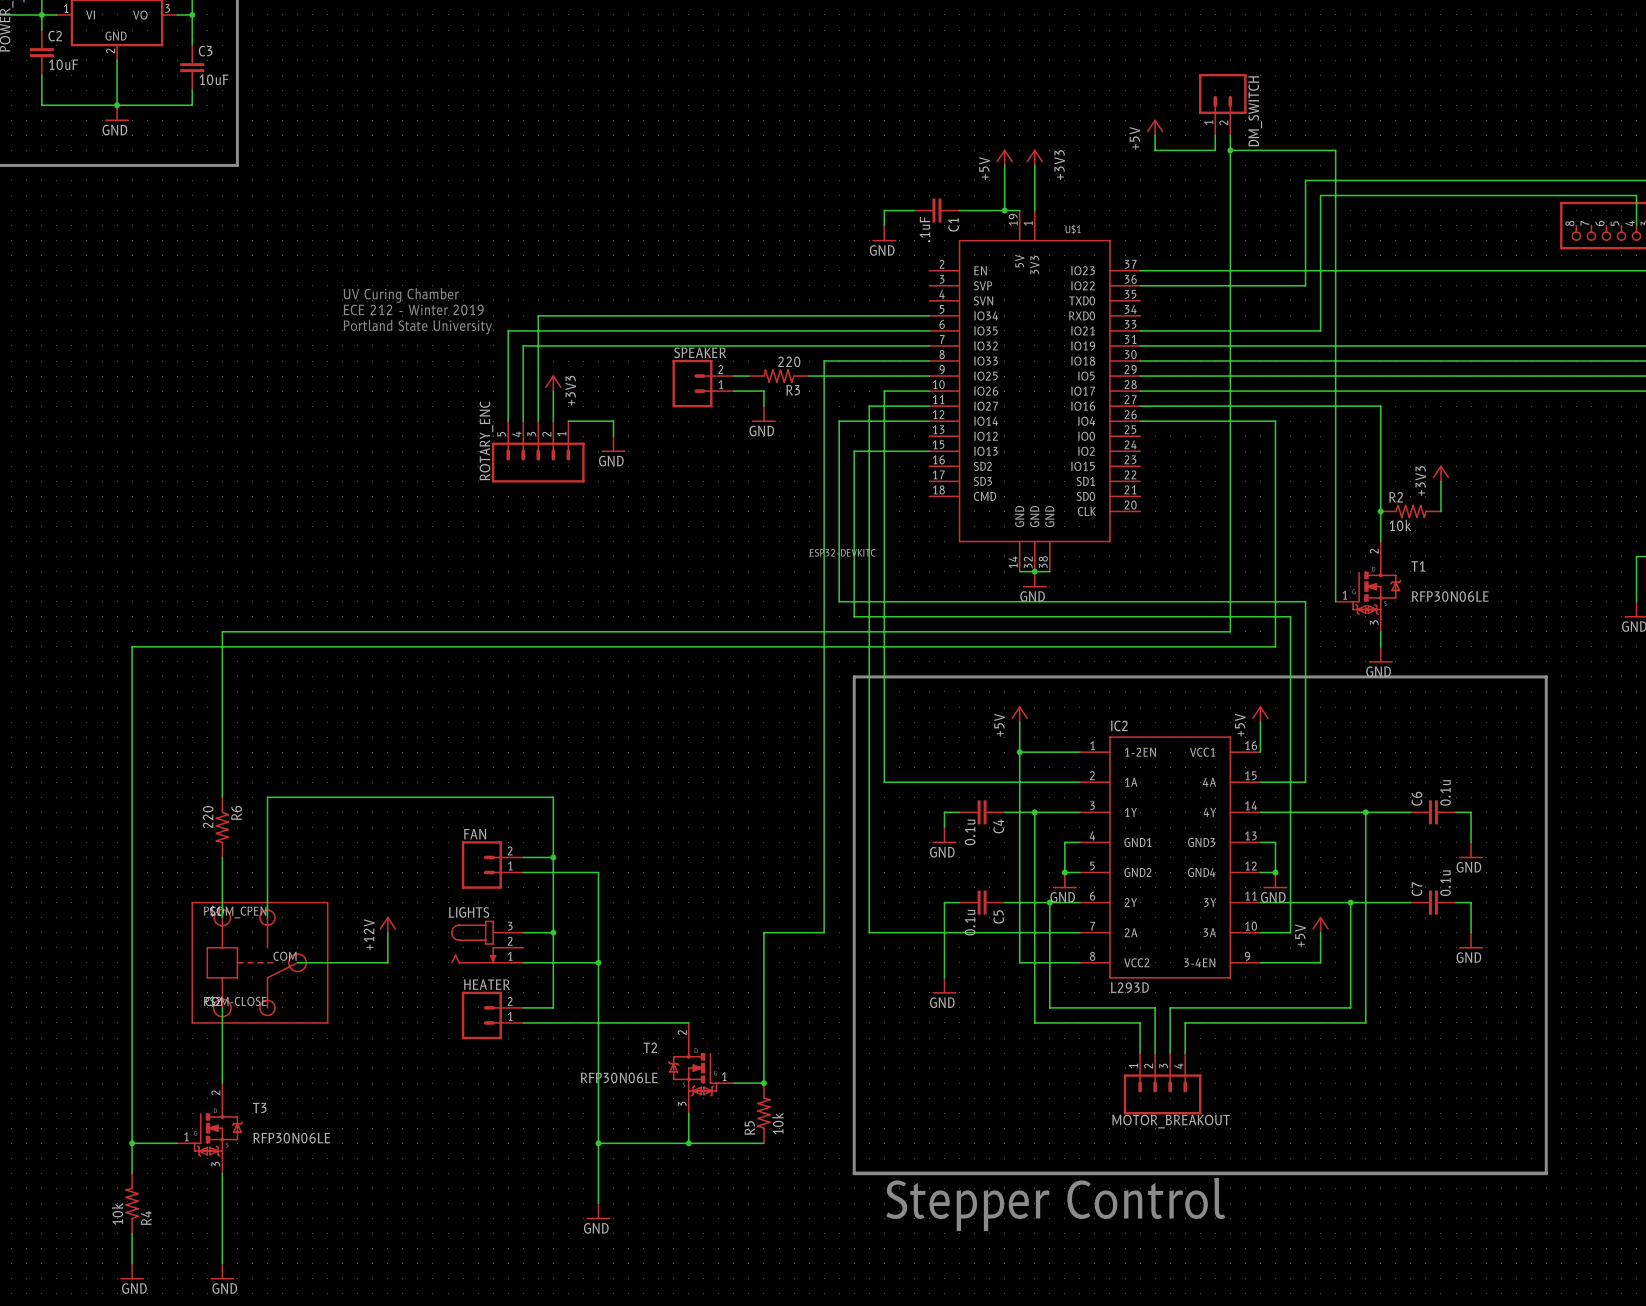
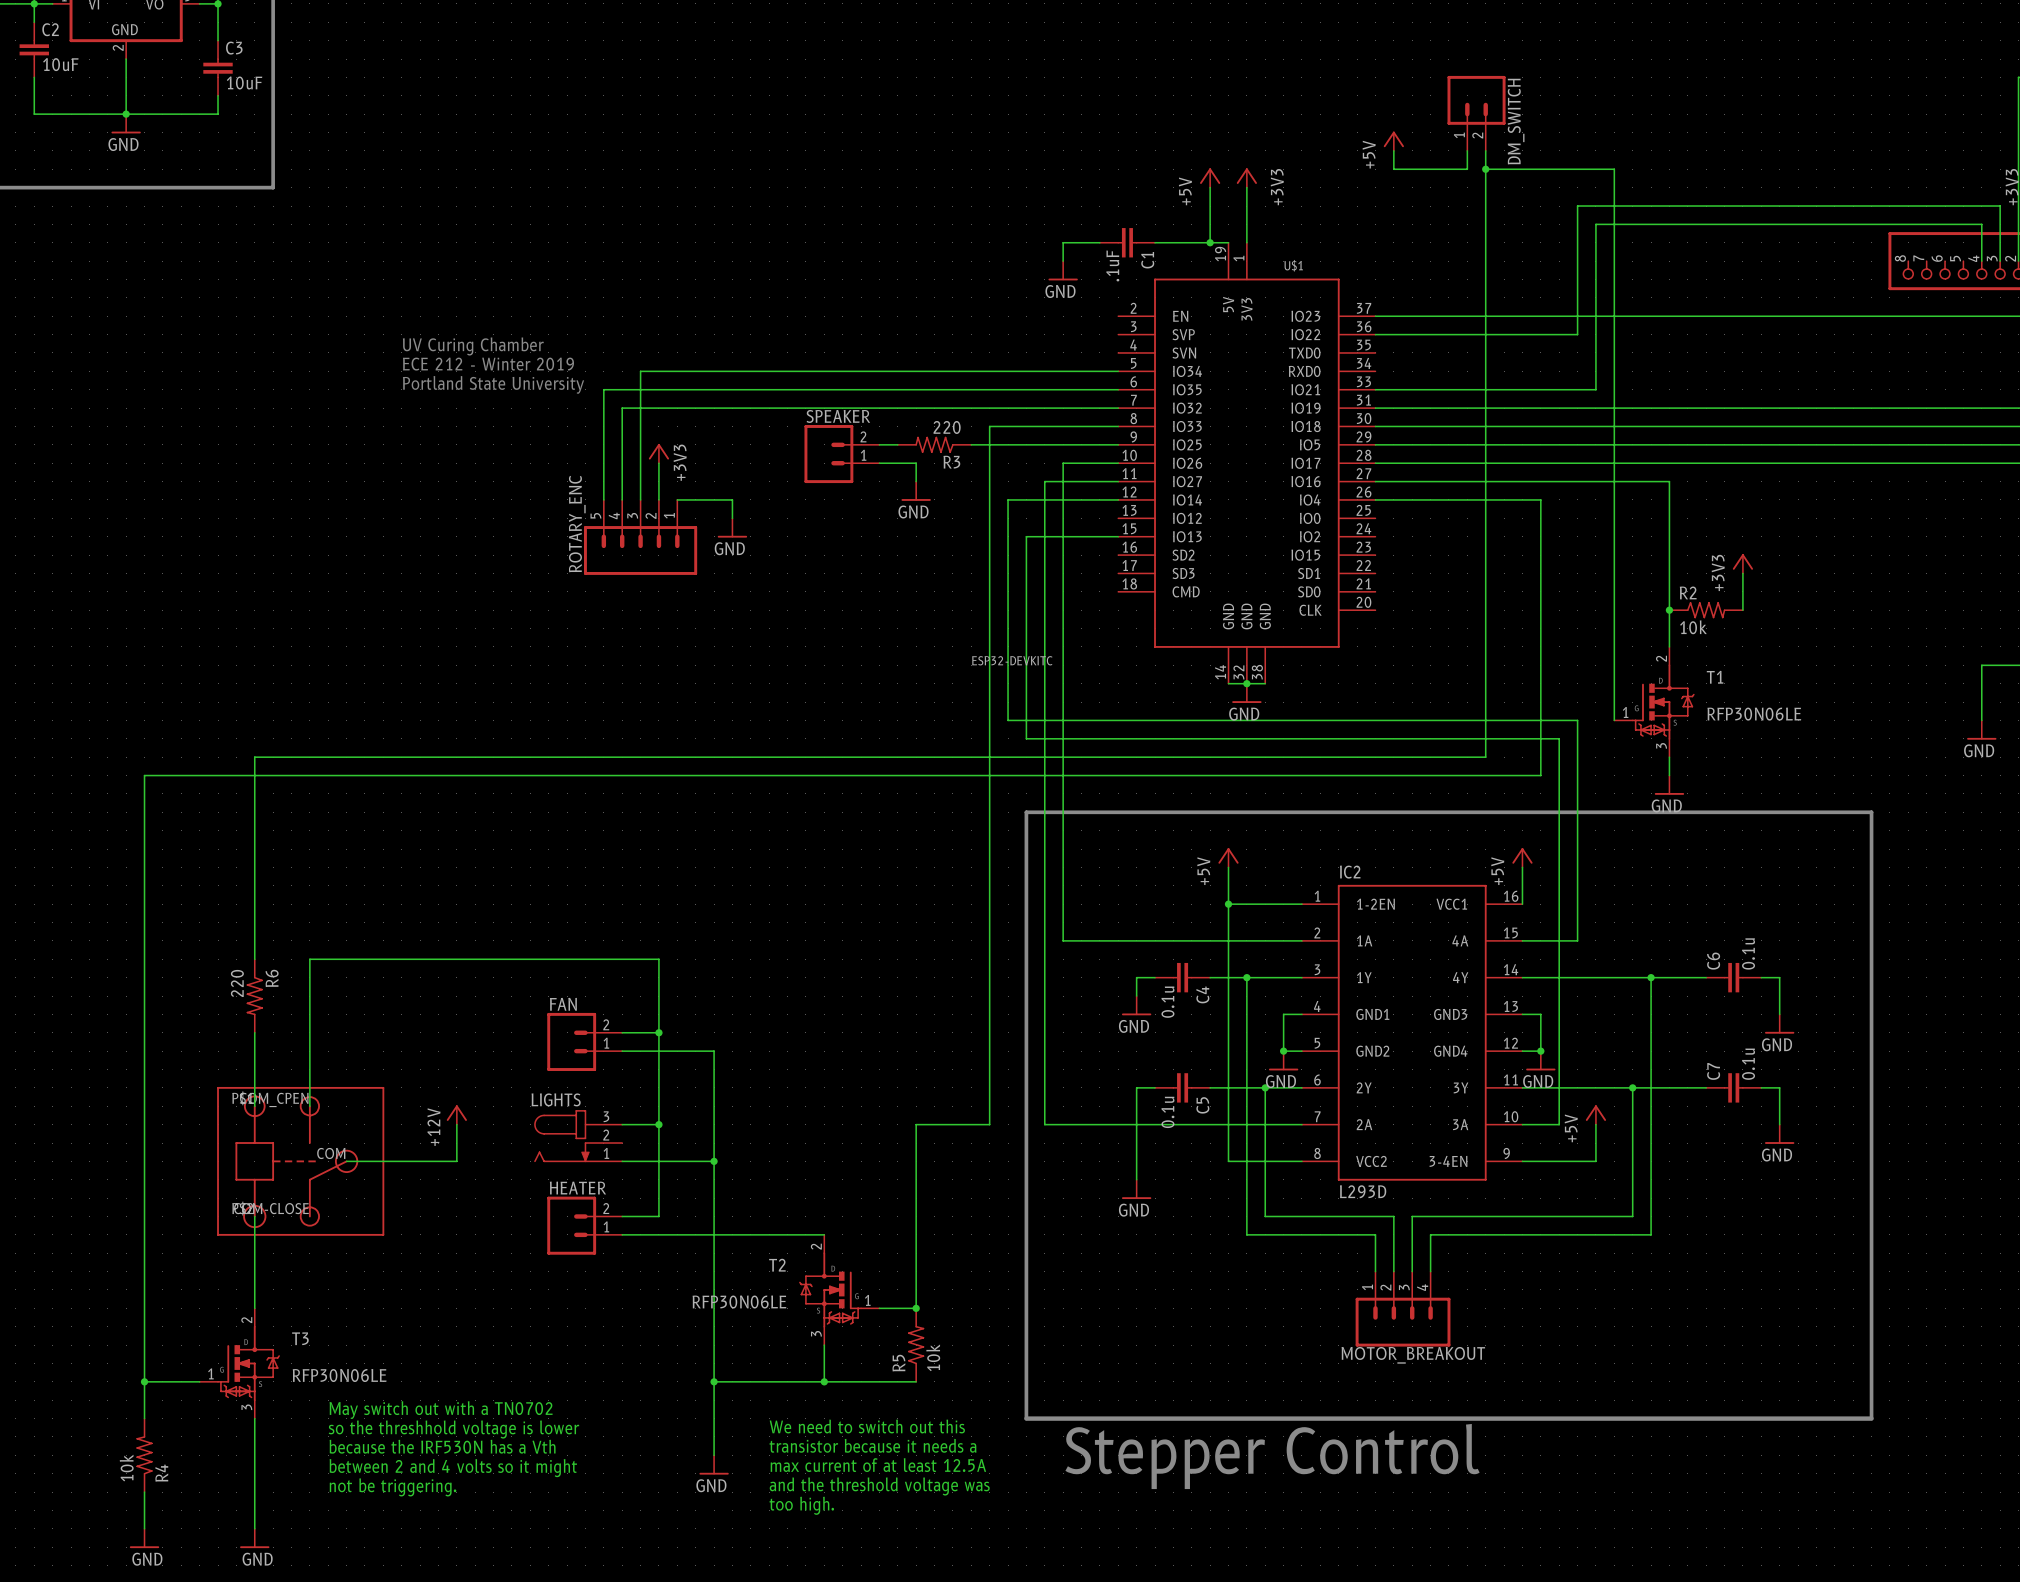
text: none -> May switch out with a TN0702 (441, 1410)
text: none -> We need to switch out this (867, 1426)
text: none -> so the threshhold voltage is lower (453, 1429)
text: none -> transistor because it needs a (873, 1445)
text: none -> because the IRF530N has a Vth (442, 1446)
text: none -> max current of at least 12.5A (878, 1465)
text: none -> between 2 and 4 volts so it might (453, 1468)
text: none -> not be triggering. (393, 1487)
text: none -> and the threshold voltage was (879, 1486)
text: none -> too high. (801, 1505)

